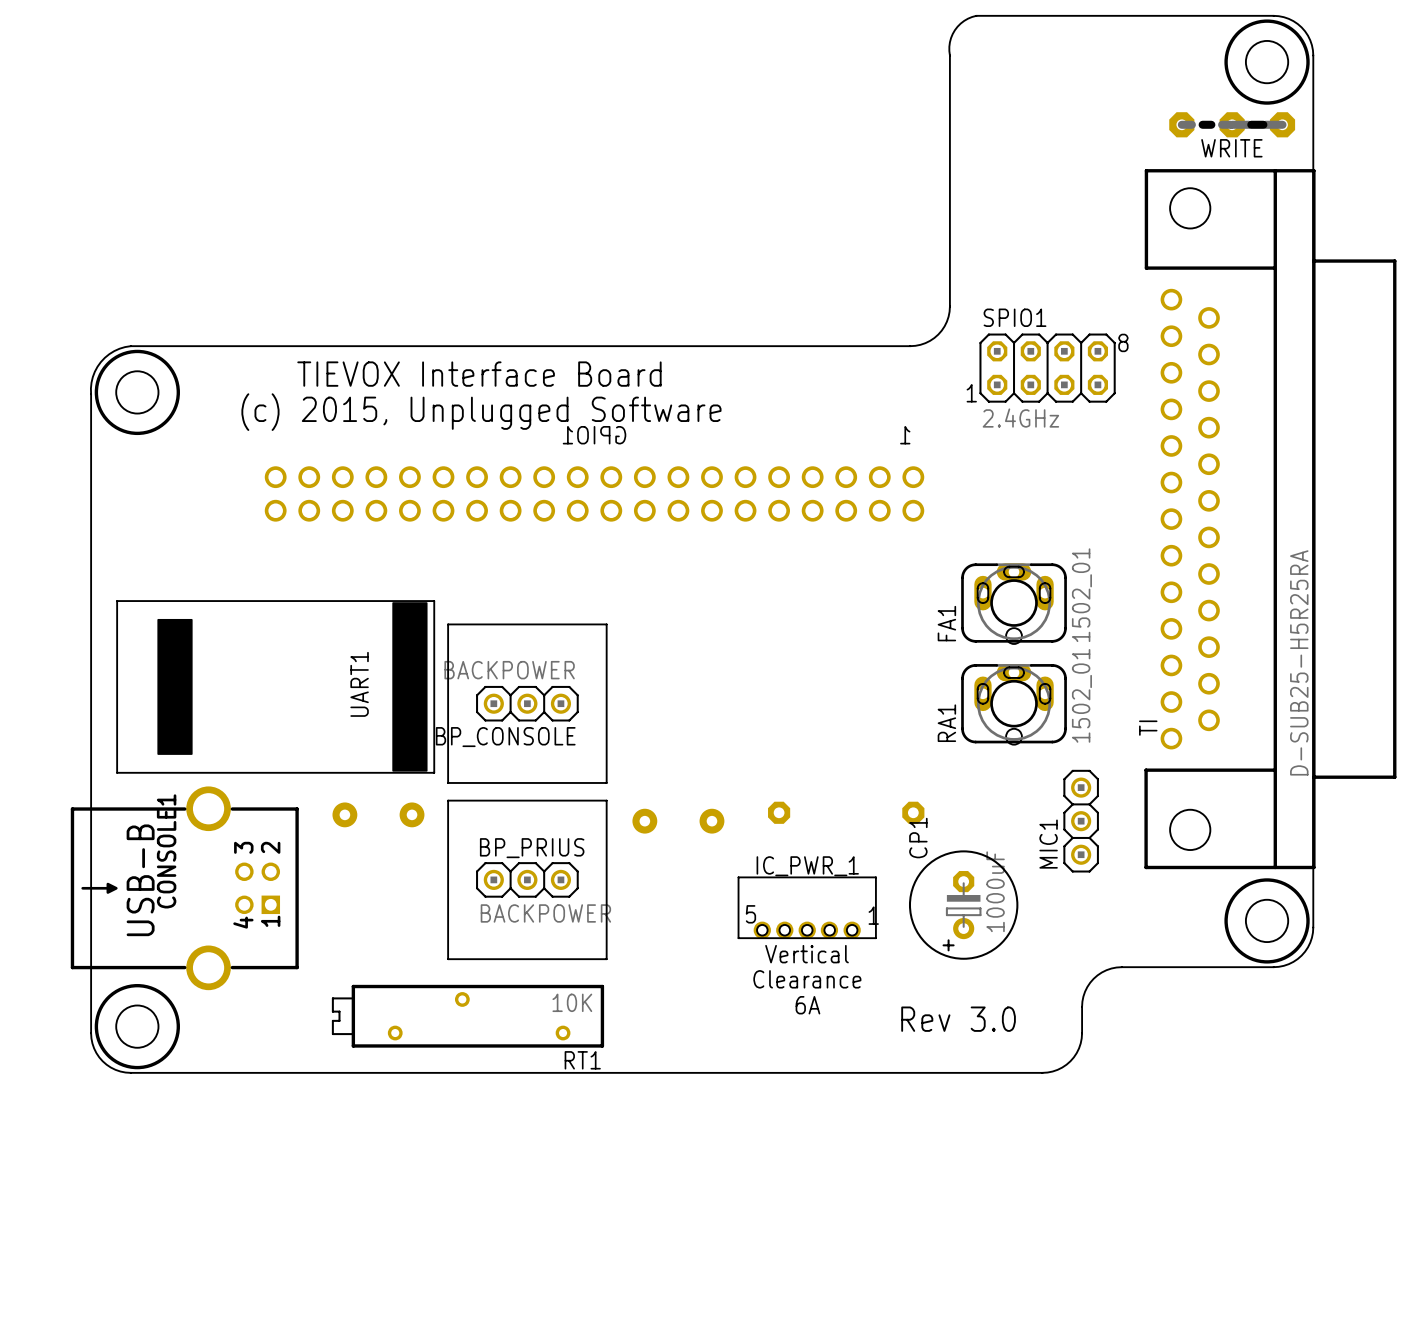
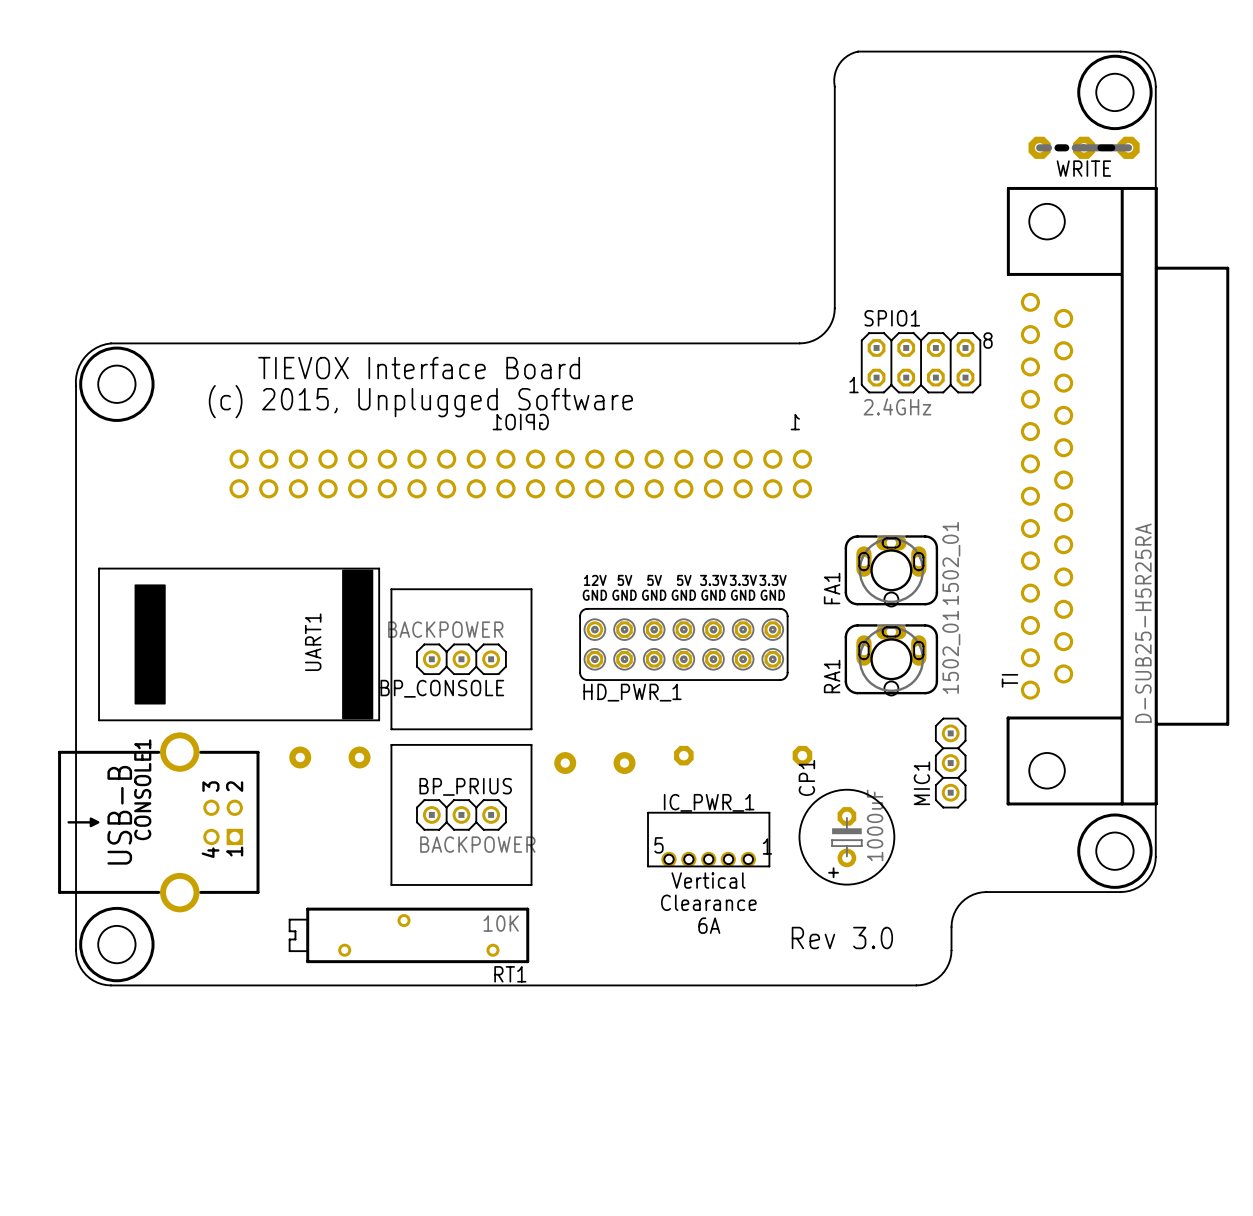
HD_PWR_1: none -> (683, 644)

